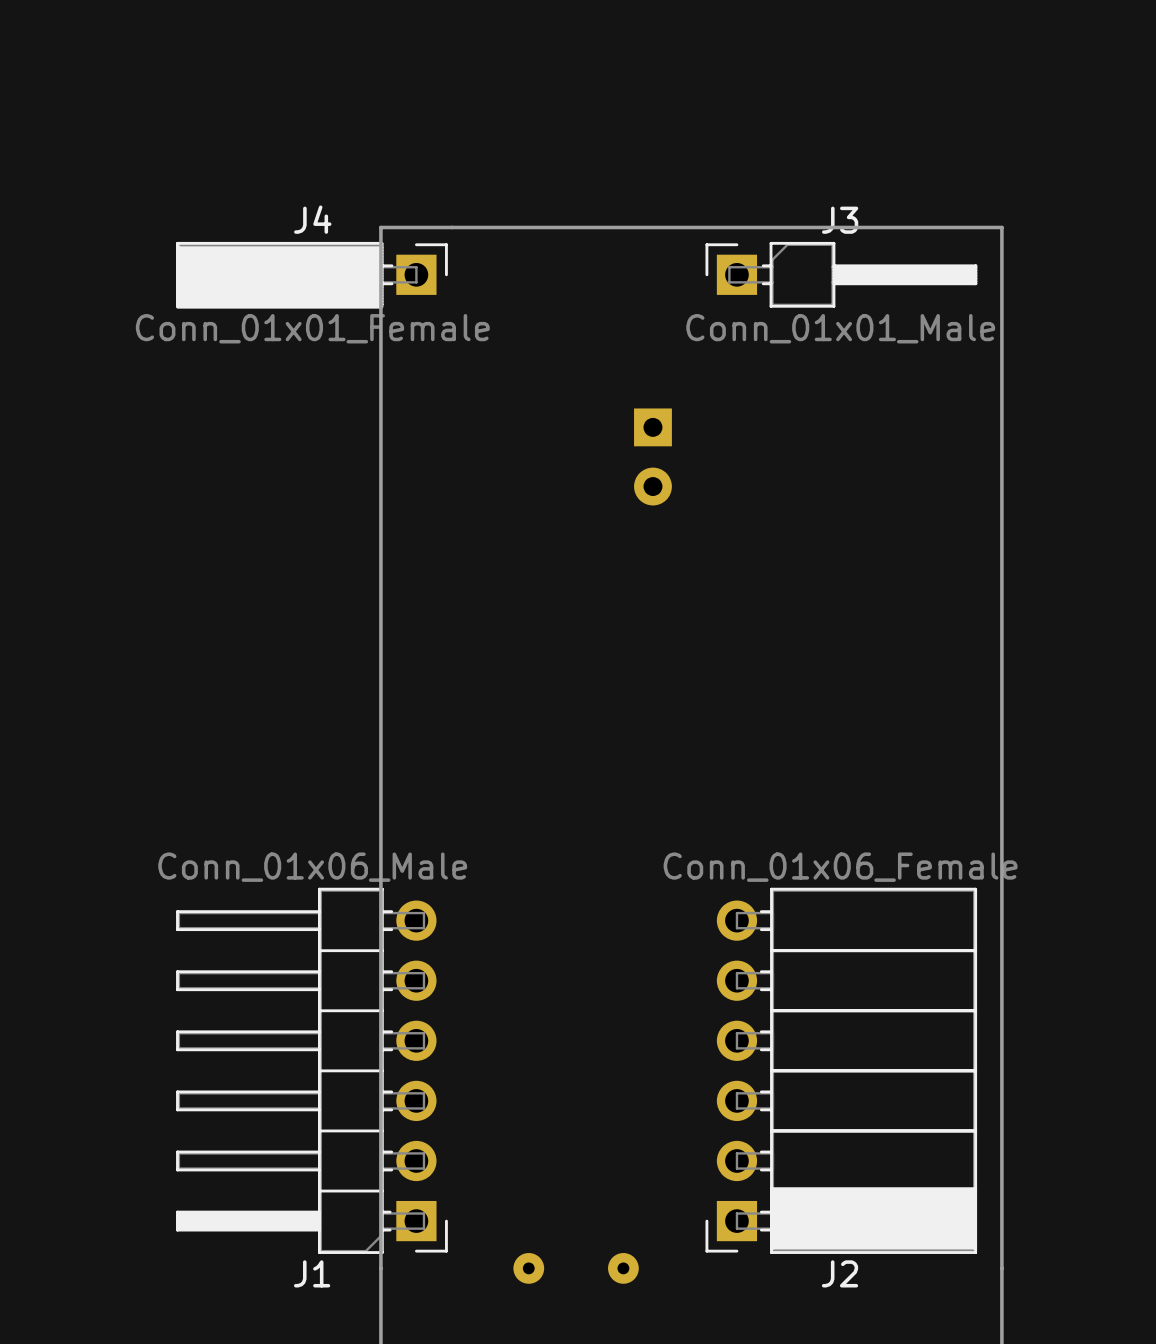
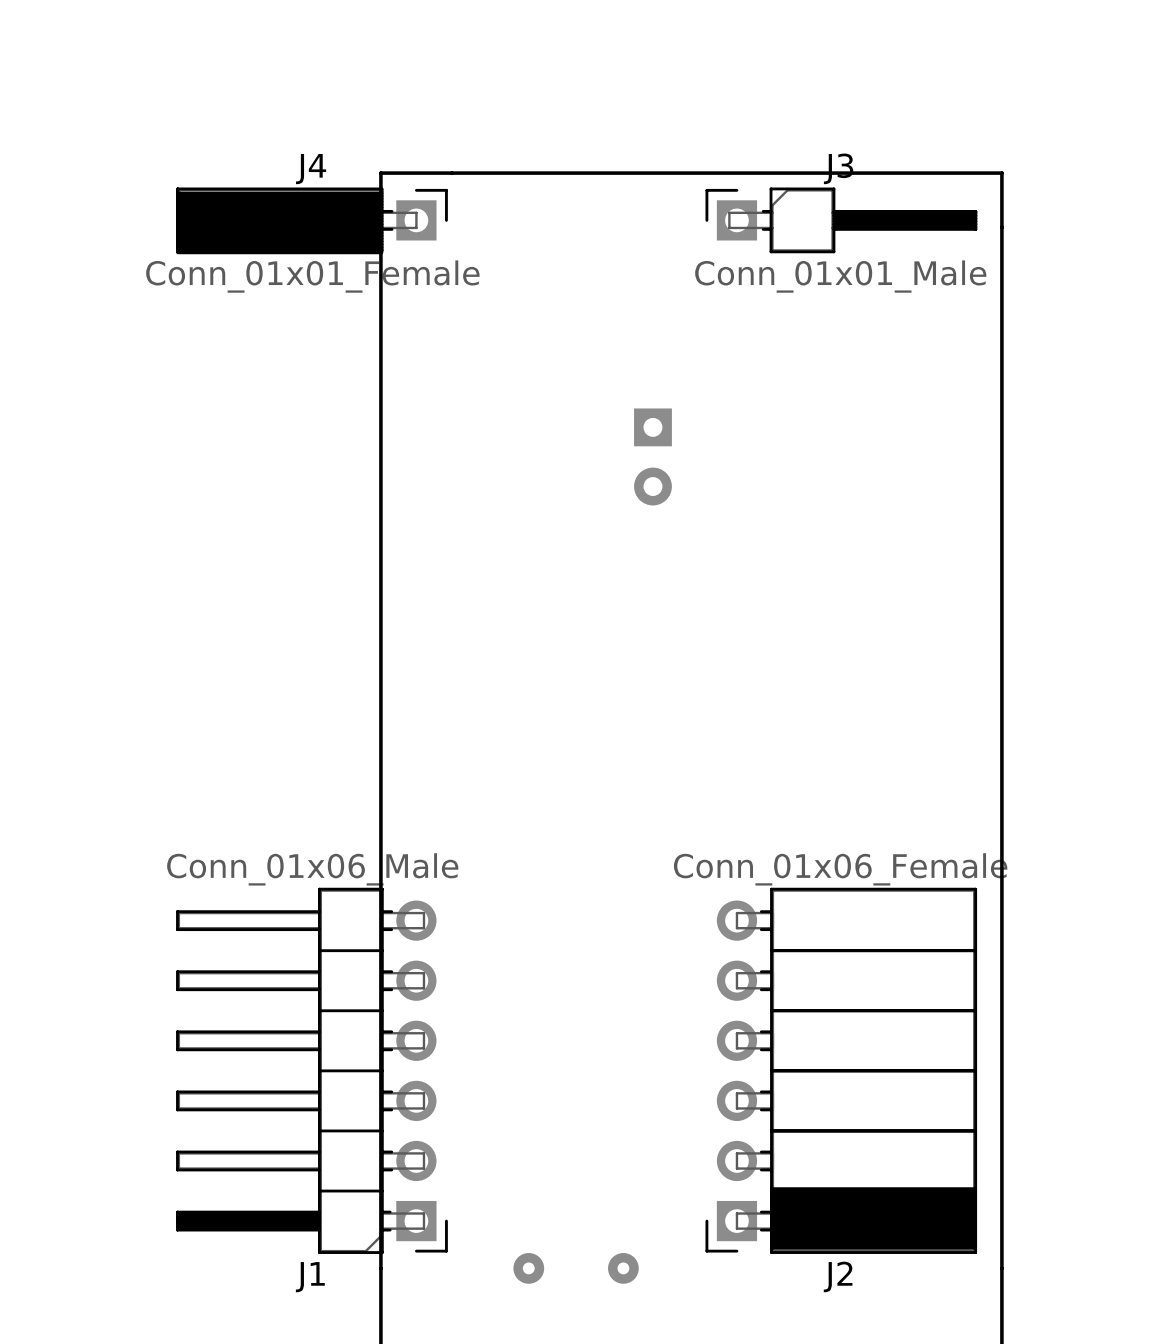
board edge: (1001, 227) (380, 227) -> (1001, 227) (1001, 173) (380, 173) (380, 227)
J3 position: (841, 274) -> (841, 220)
J4 position: (312, 275) -> (312, 220)

